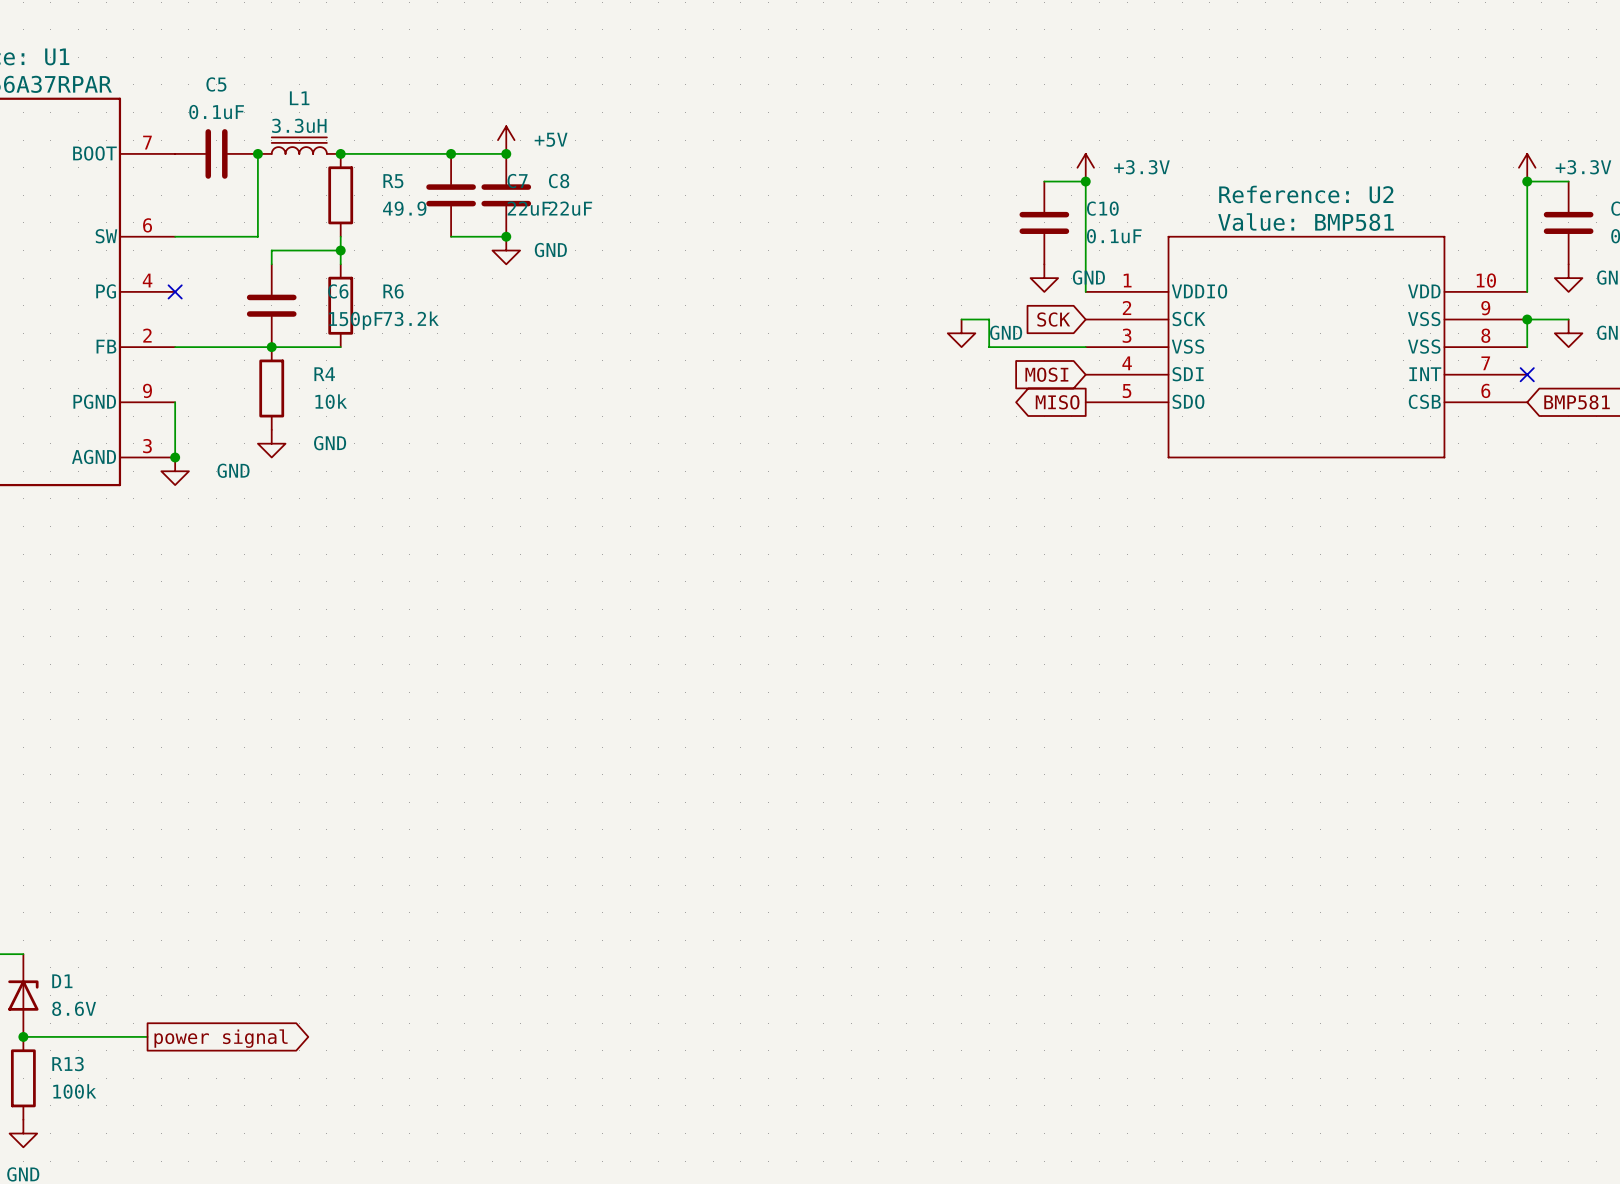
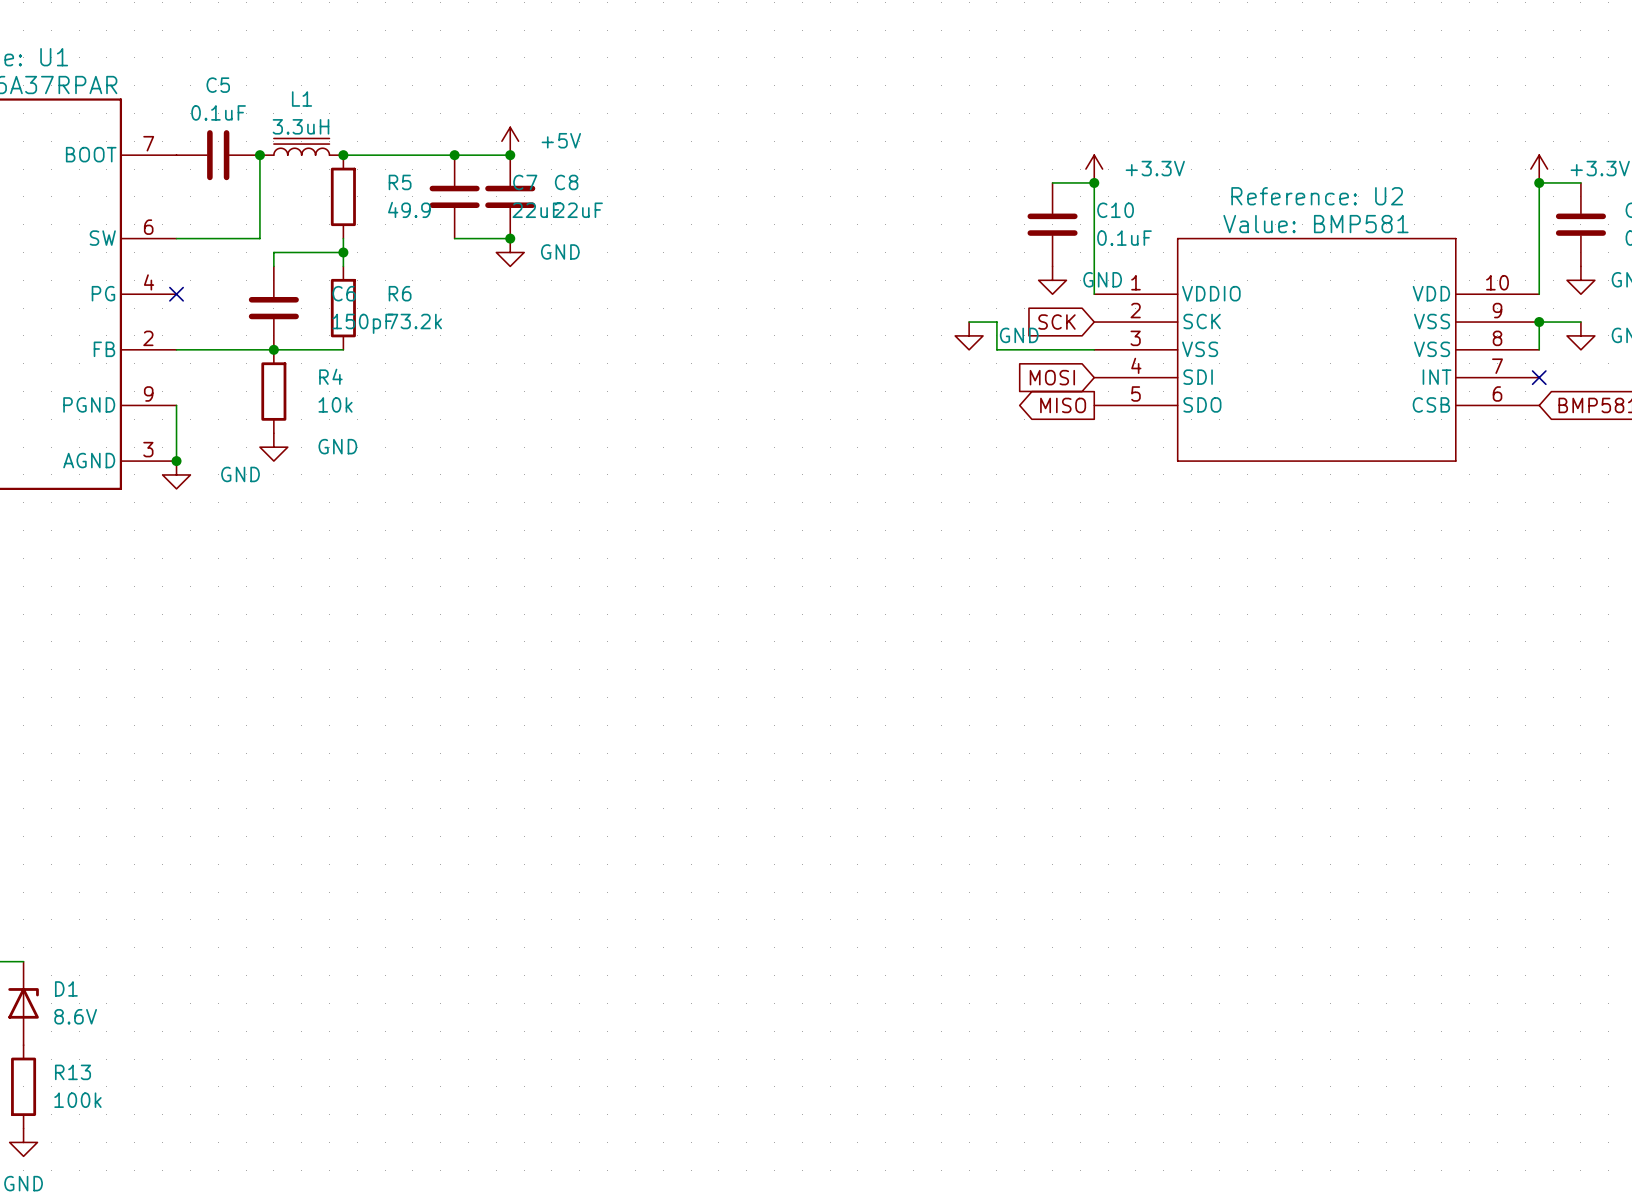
wire: (23, 1036) (147, 1036) -> none
junction: (23, 1036) -> none
global label: power signal (221, 1038) -> none

